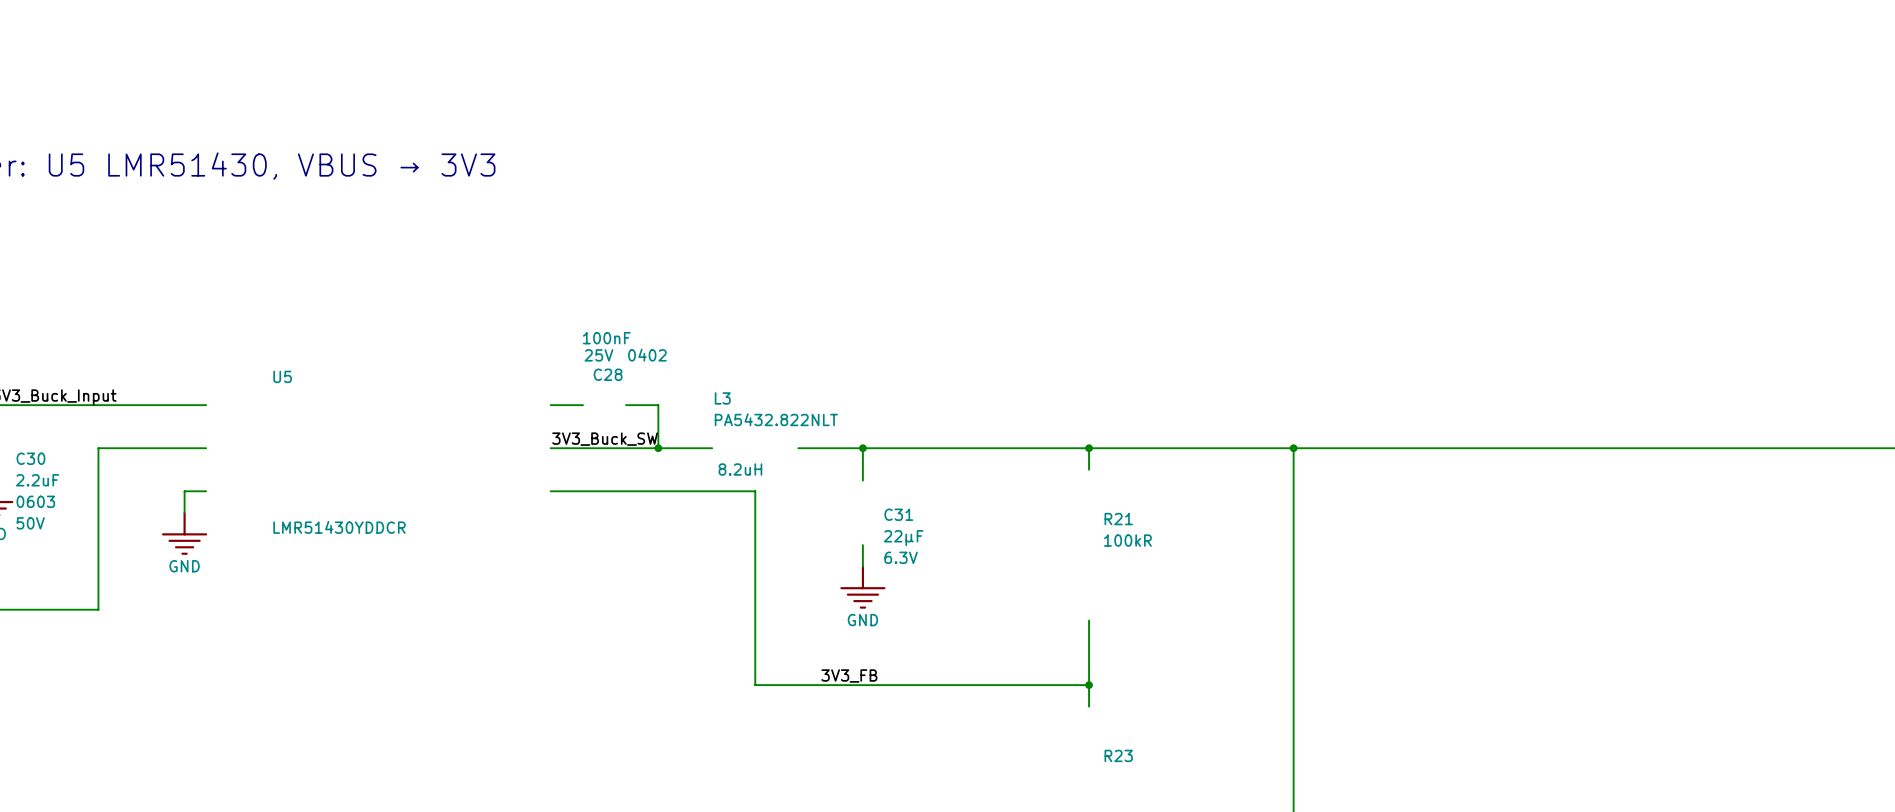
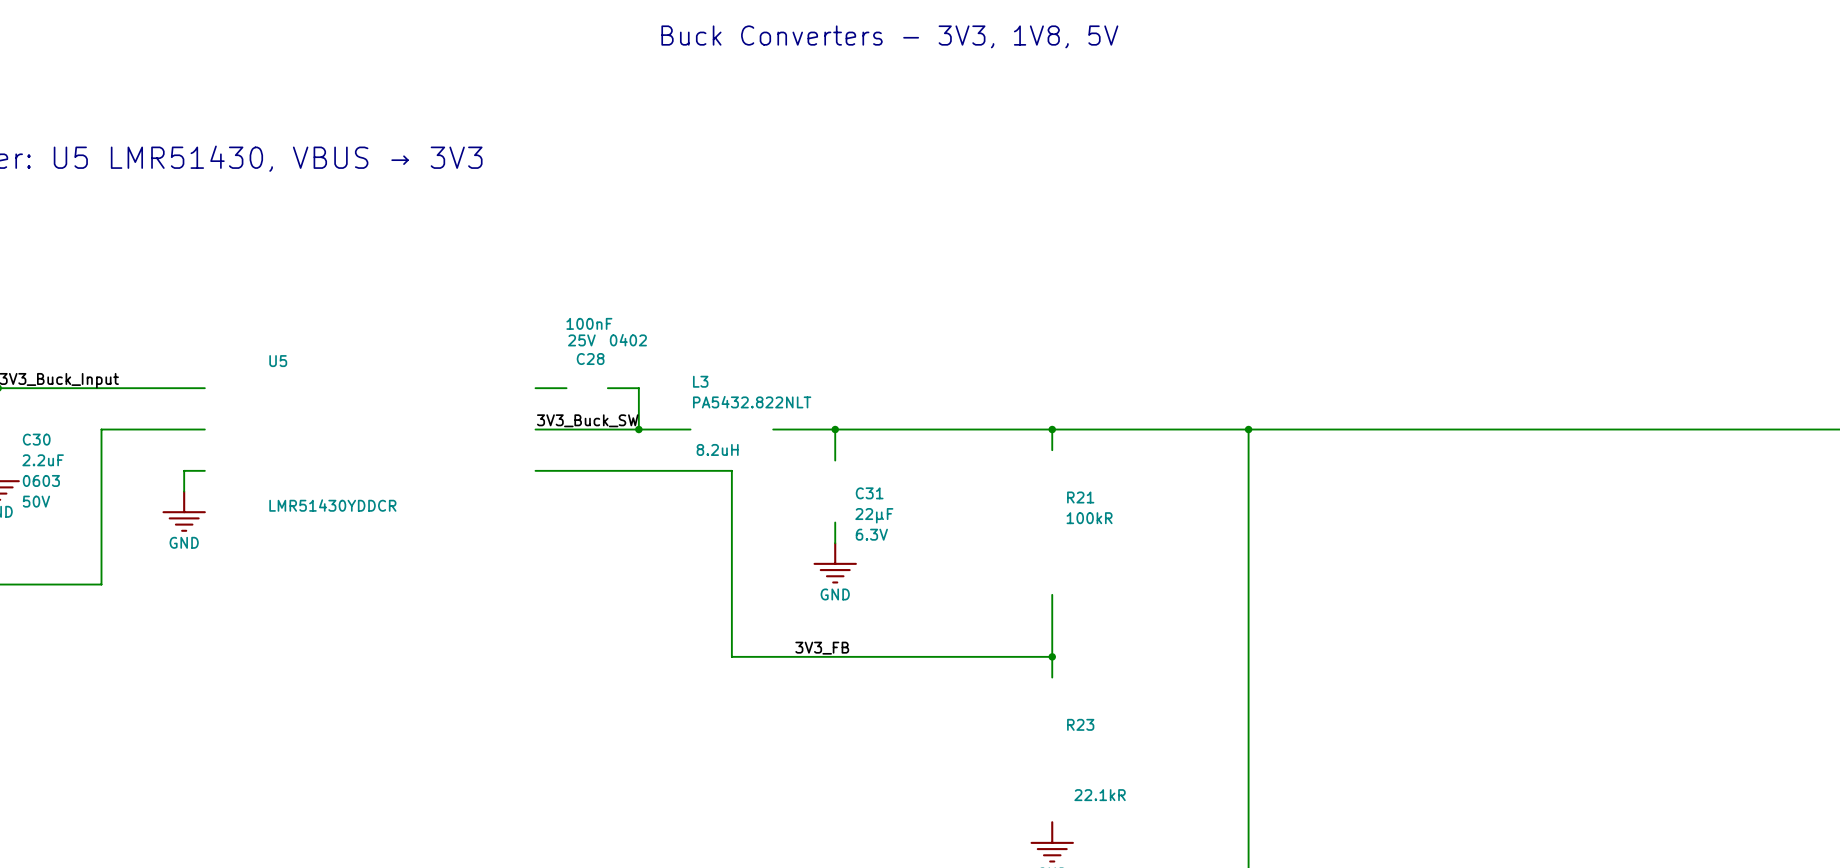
text: none -> Buck Converters - 3V3, 1V8, 5V (889, 36)

